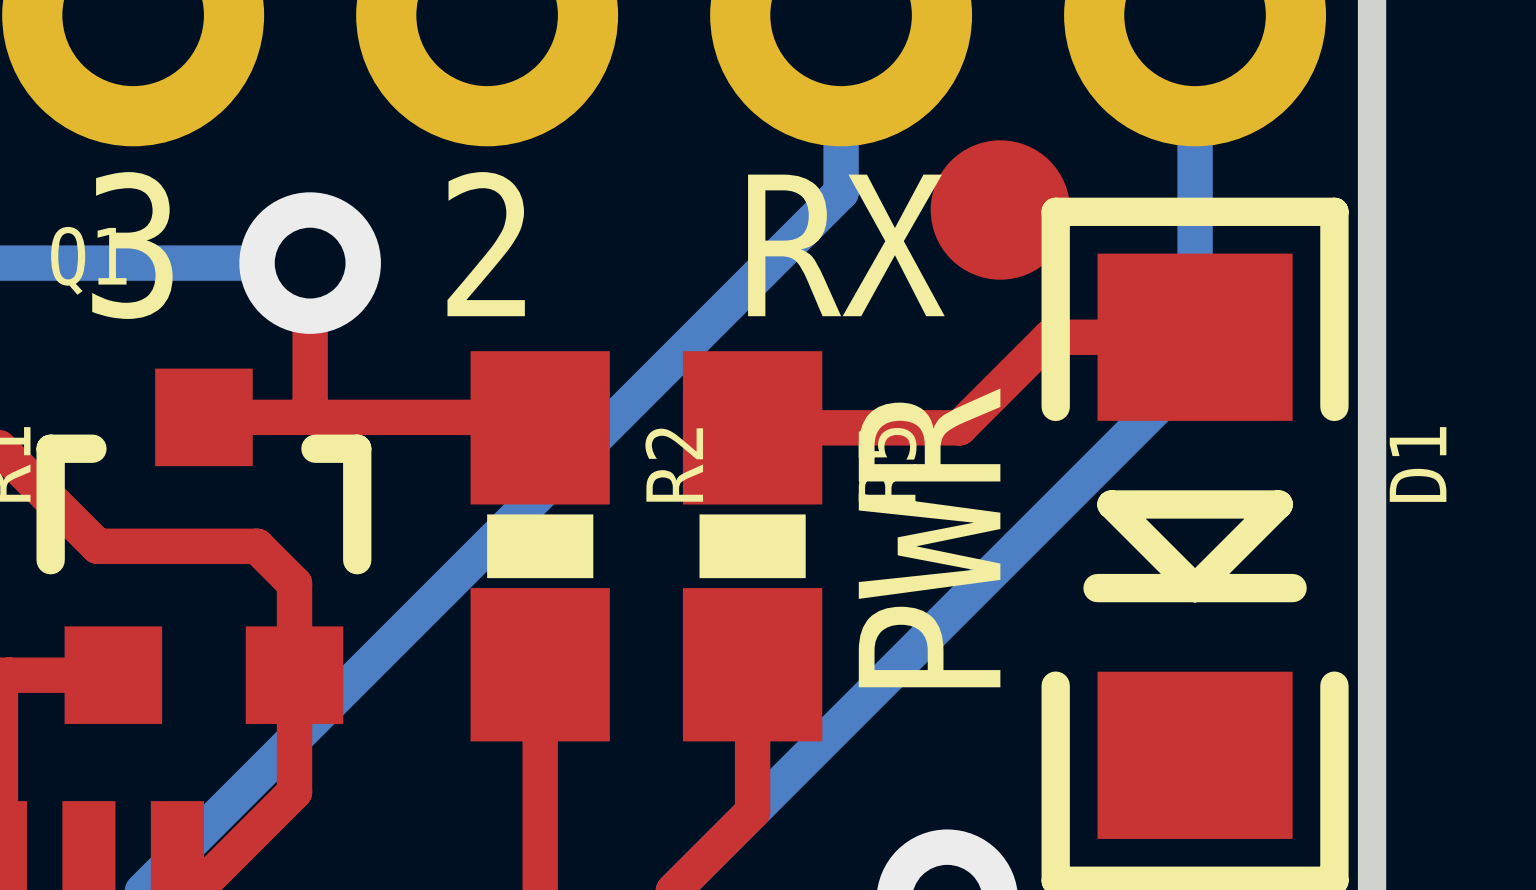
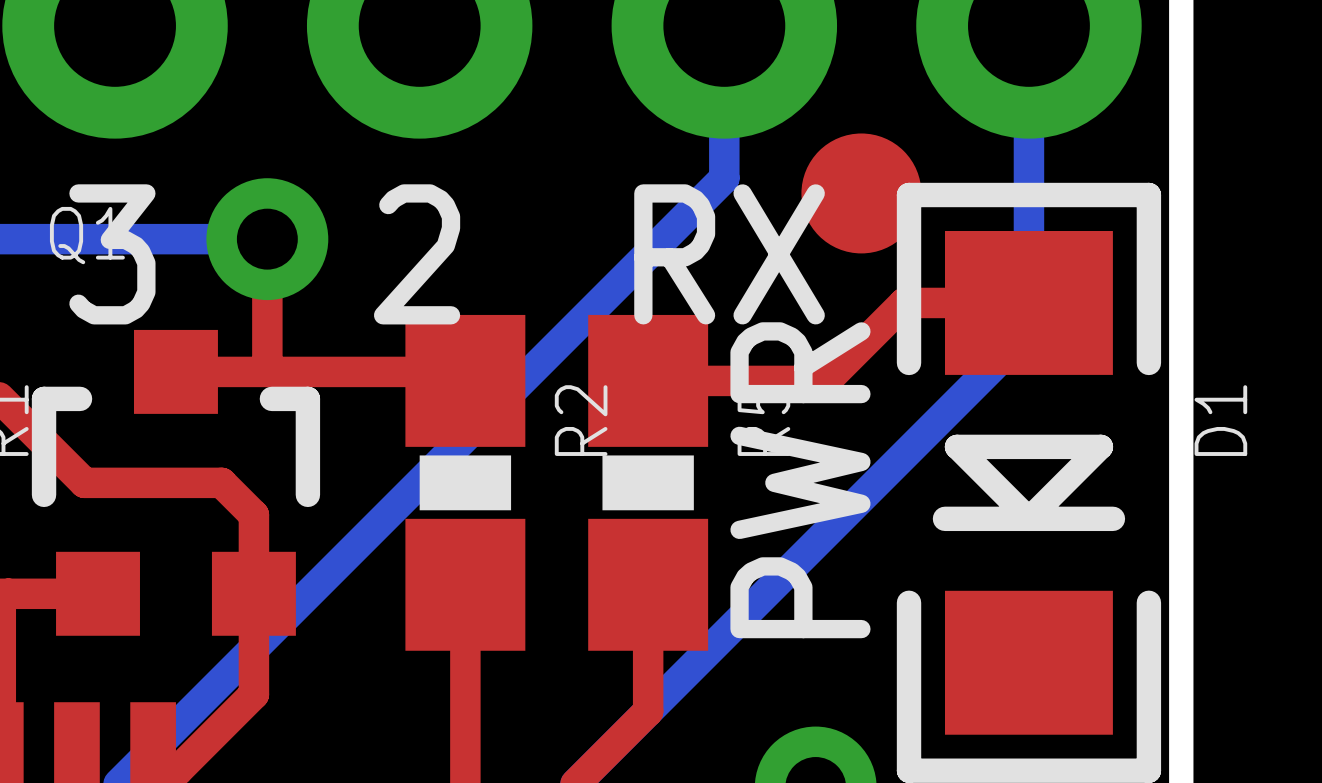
text position: 2 (486, 244) -> 2 (417, 254)
text position: 3 (132, 245) -> 3 (112, 254)
text position: RX (846, 245) -> RX (729, 254)

